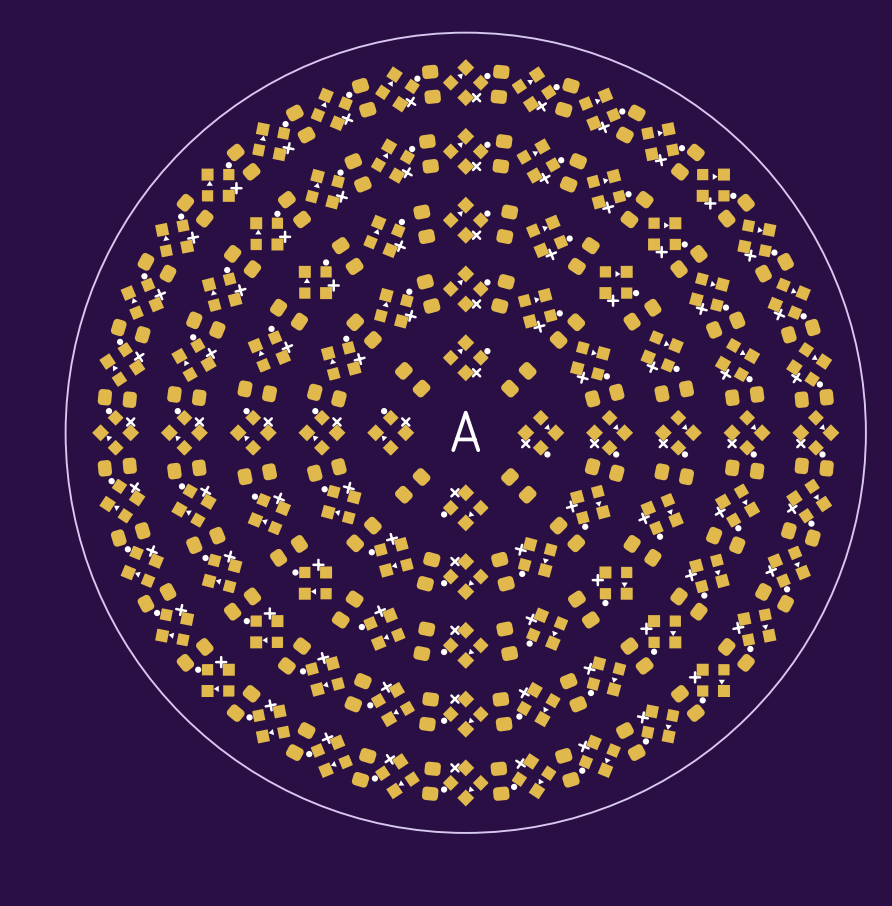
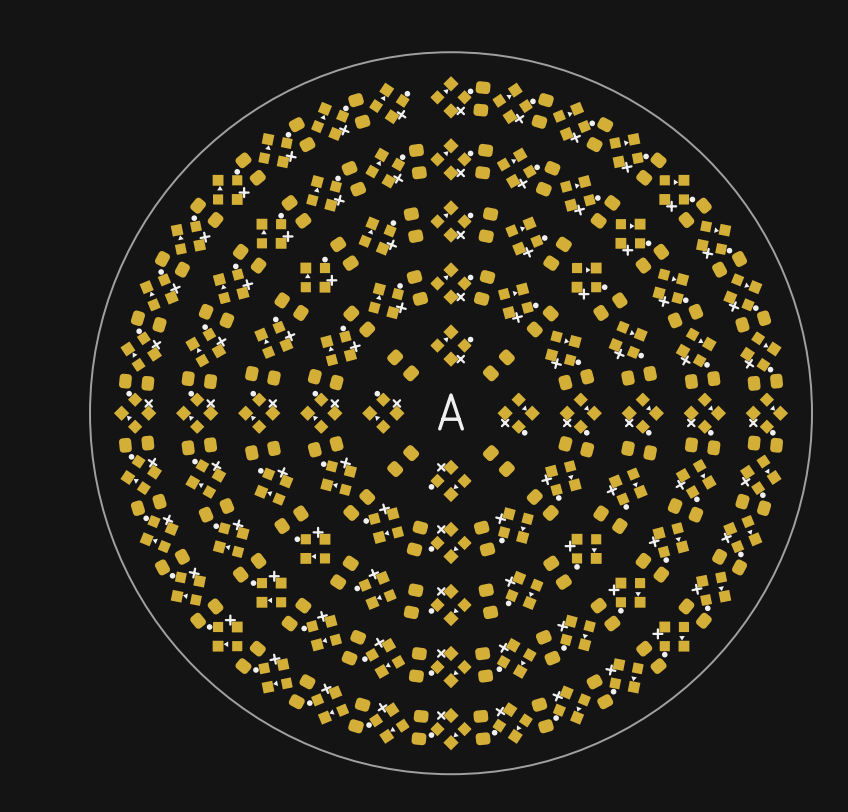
part: (431, 84) -> none

